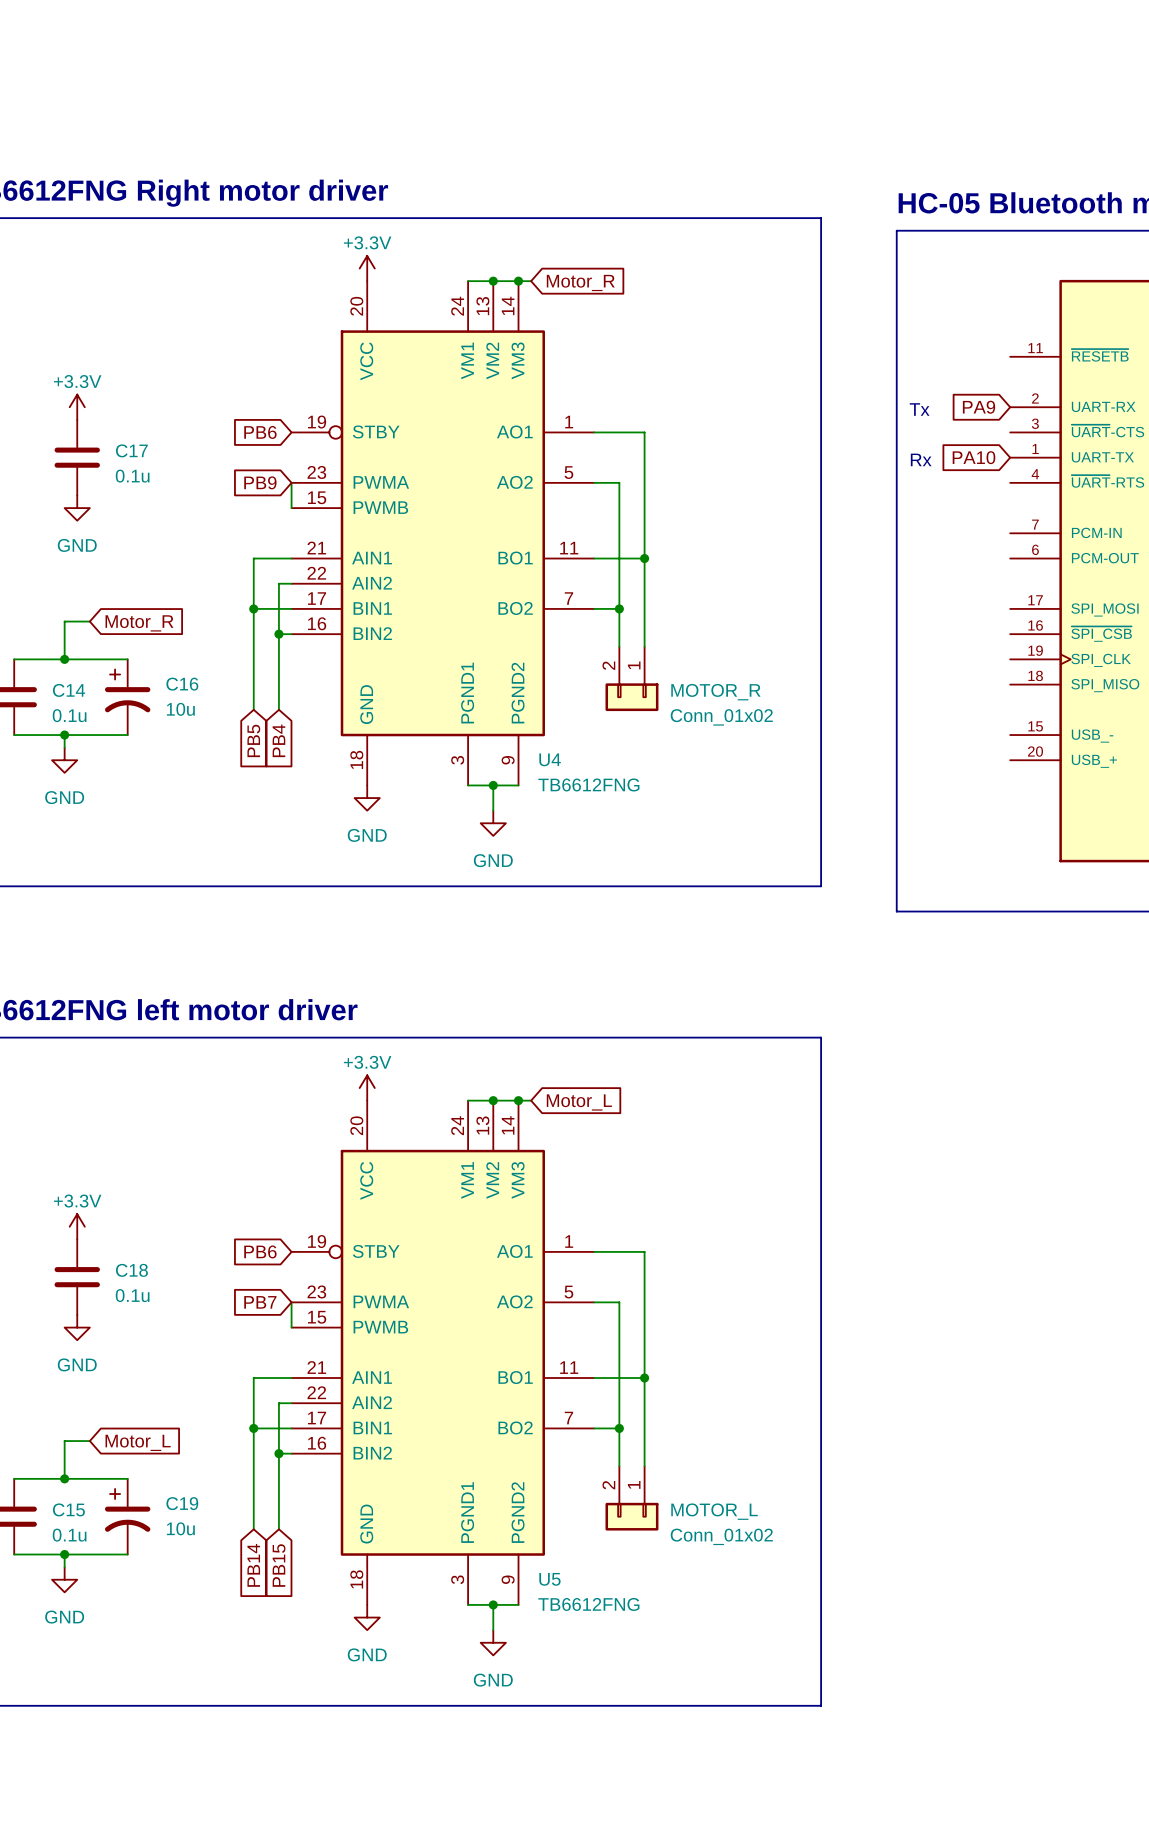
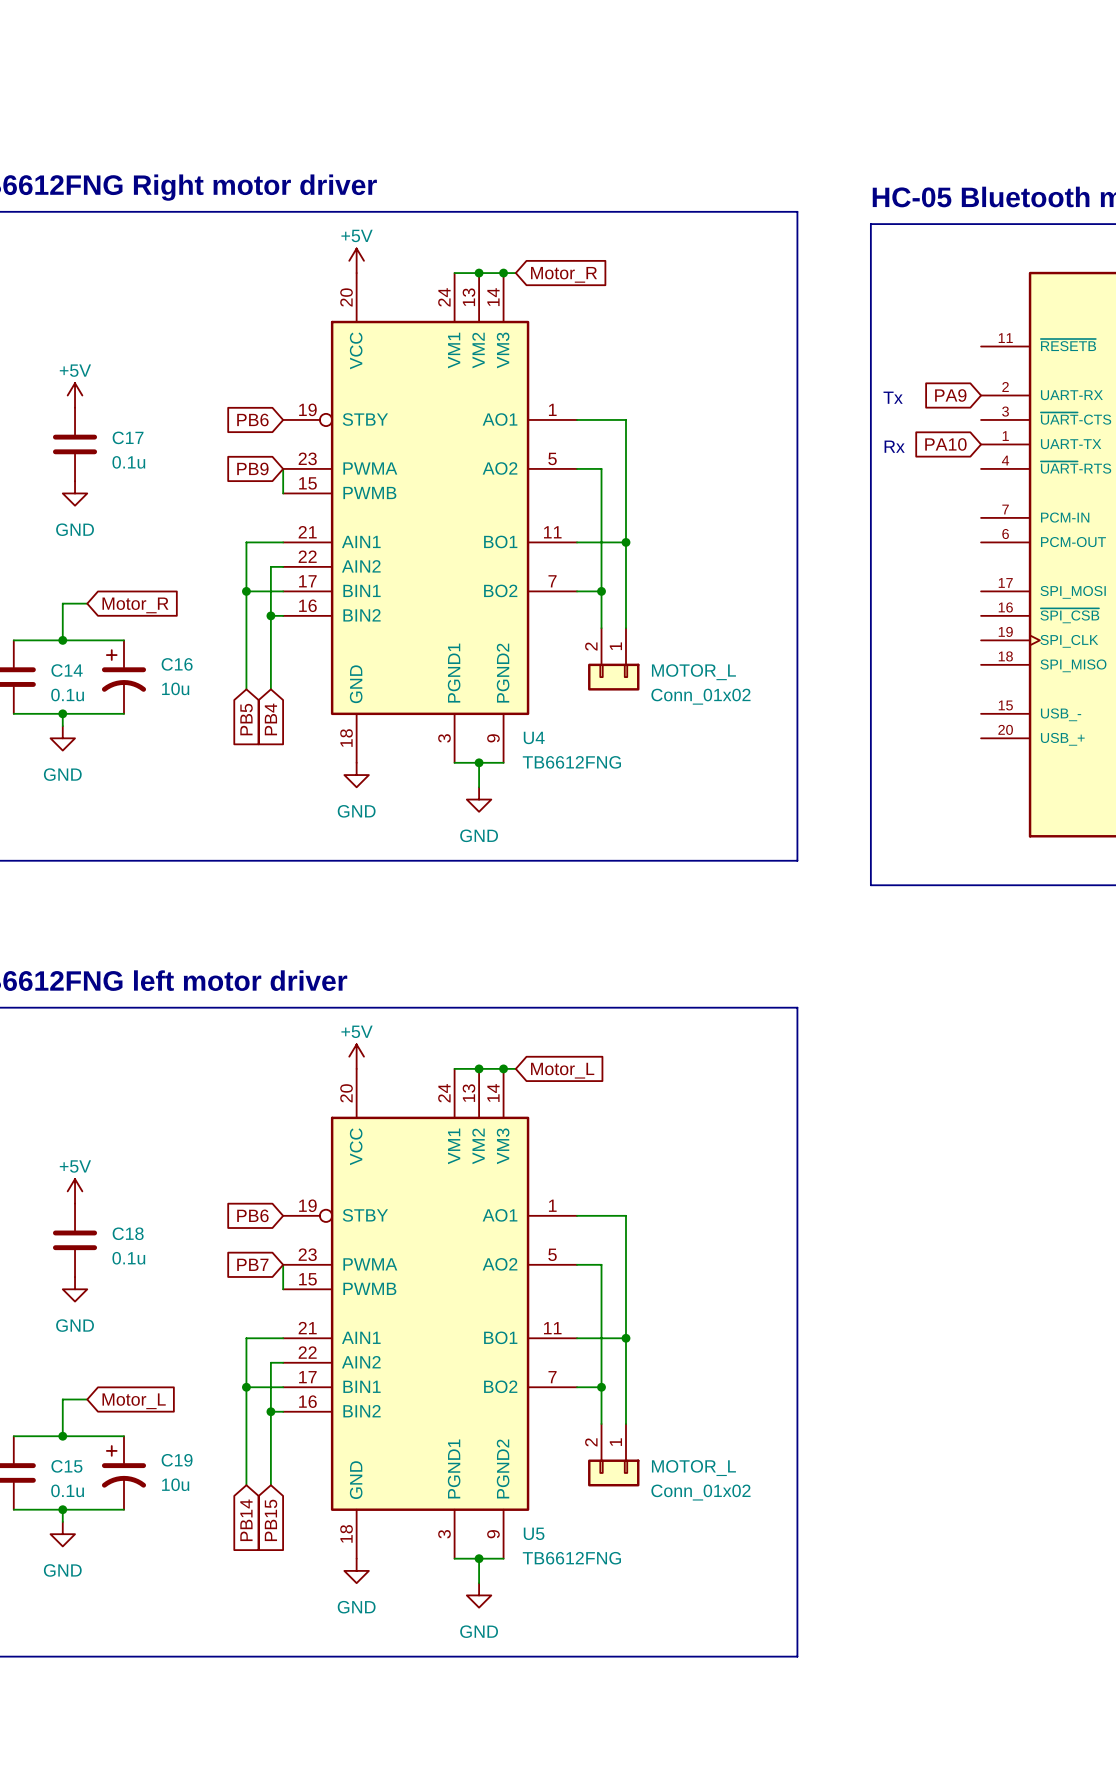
power symbol: +3.3V (367, 268) -> +5V (356, 260)
power symbol: +3.3V (77, 407) -> +5V (75, 395)
MOTOR_R name: MOTOR_R (715, 692) -> MOTOR_L (693, 672)
power symbol: +3.3V (367, 1088) -> +5V (356, 1056)
power symbol: +3.3V (77, 1226) -> +5V (75, 1191)

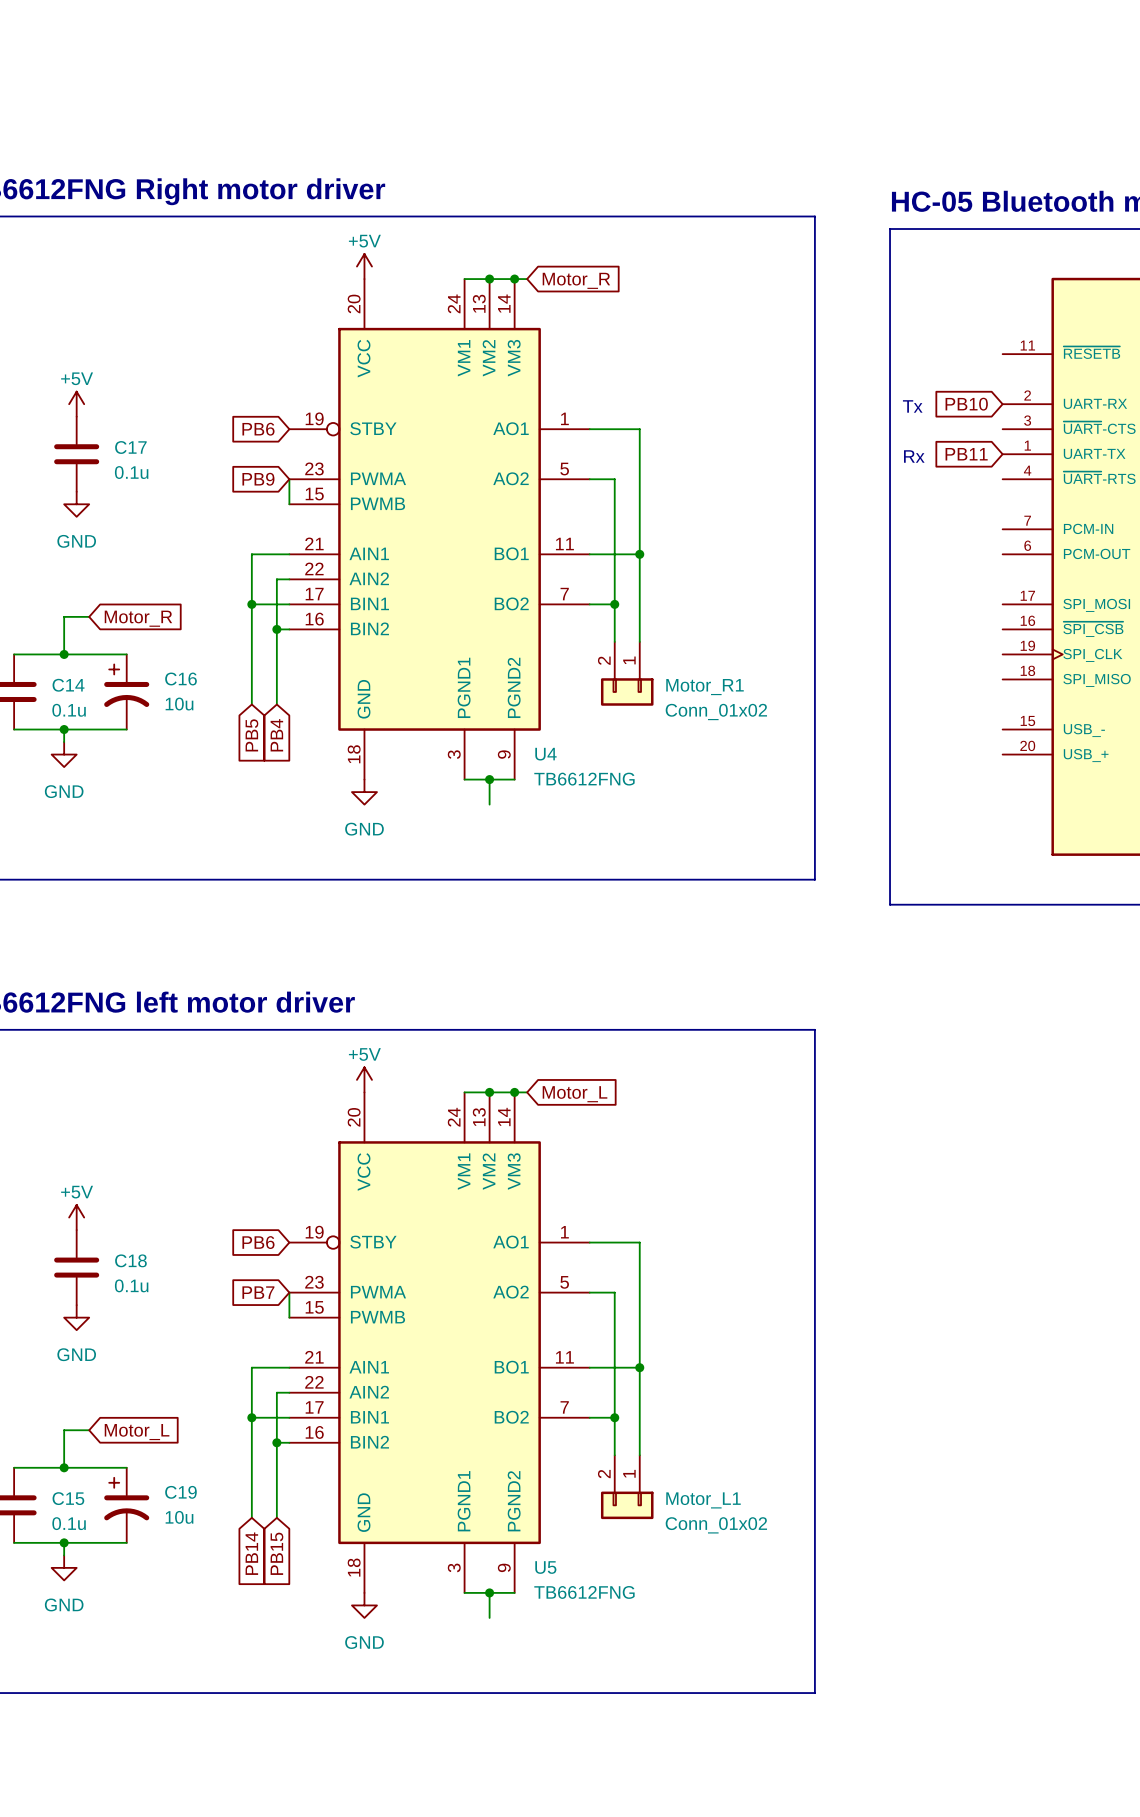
global label: PA9 (950, 395) -> PB10 (966, 404)
global label: PA10 (945, 444) -> PB11 (966, 454)
MOTOR_L name: MOTOR_L (693, 672) -> Motor_R1 (705, 687)
power symbol: GND (479, 799) -> none
MOTOR_L name: MOTOR_L (693, 1468) -> Motor_L1 (703, 1500)
power symbol: GND (479, 1595) -> none

